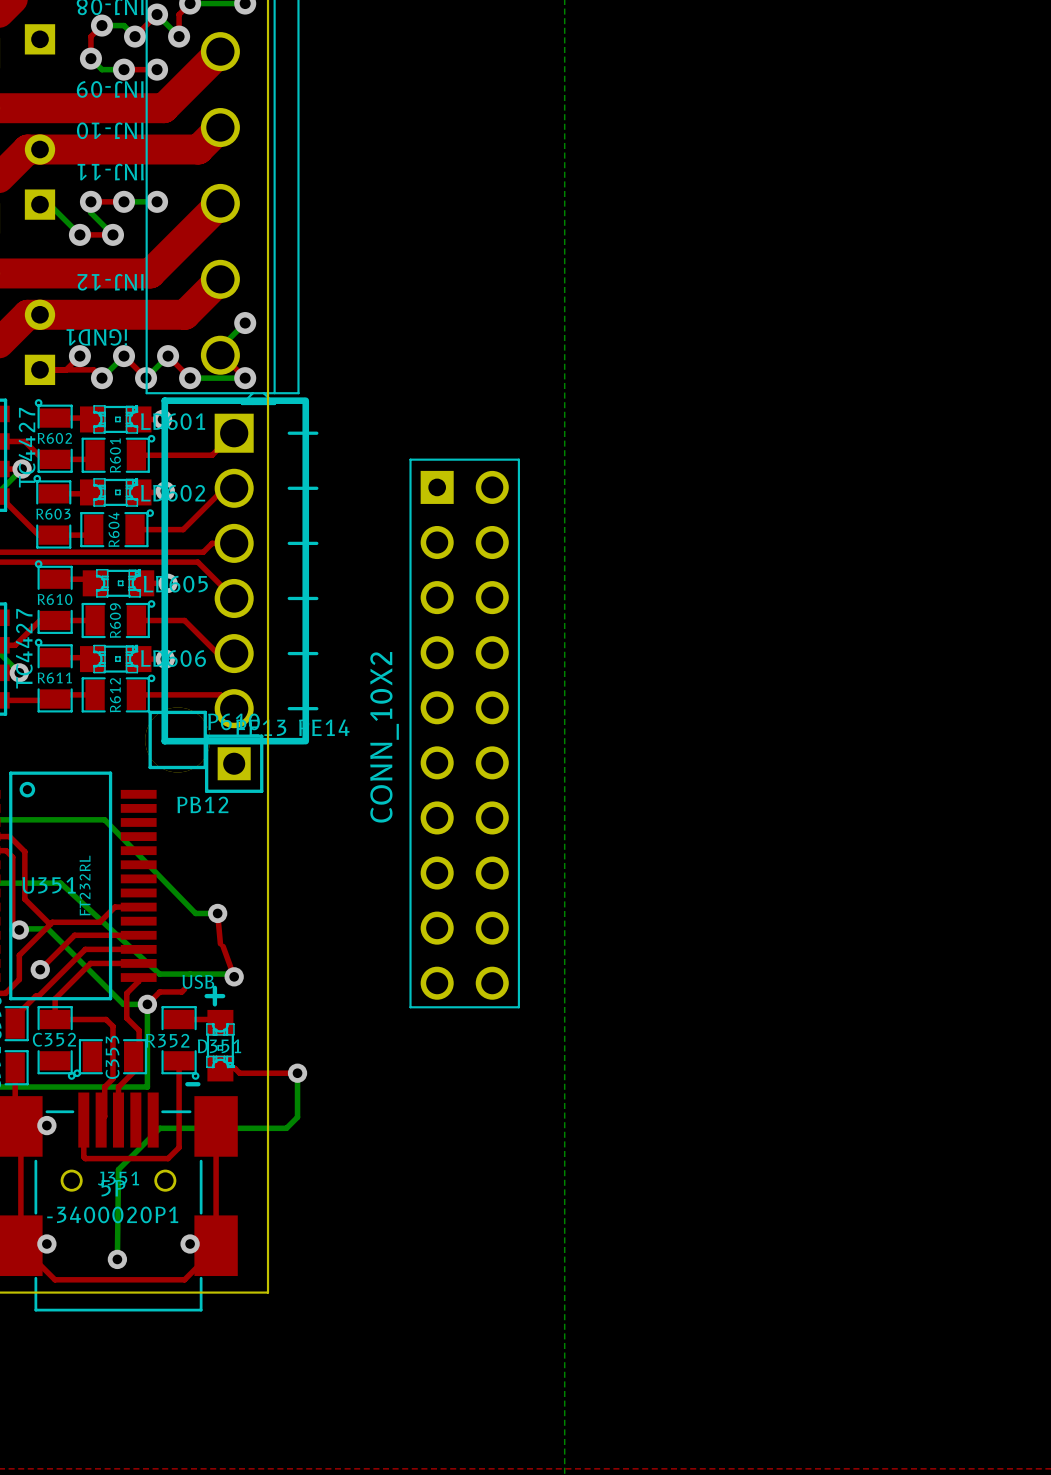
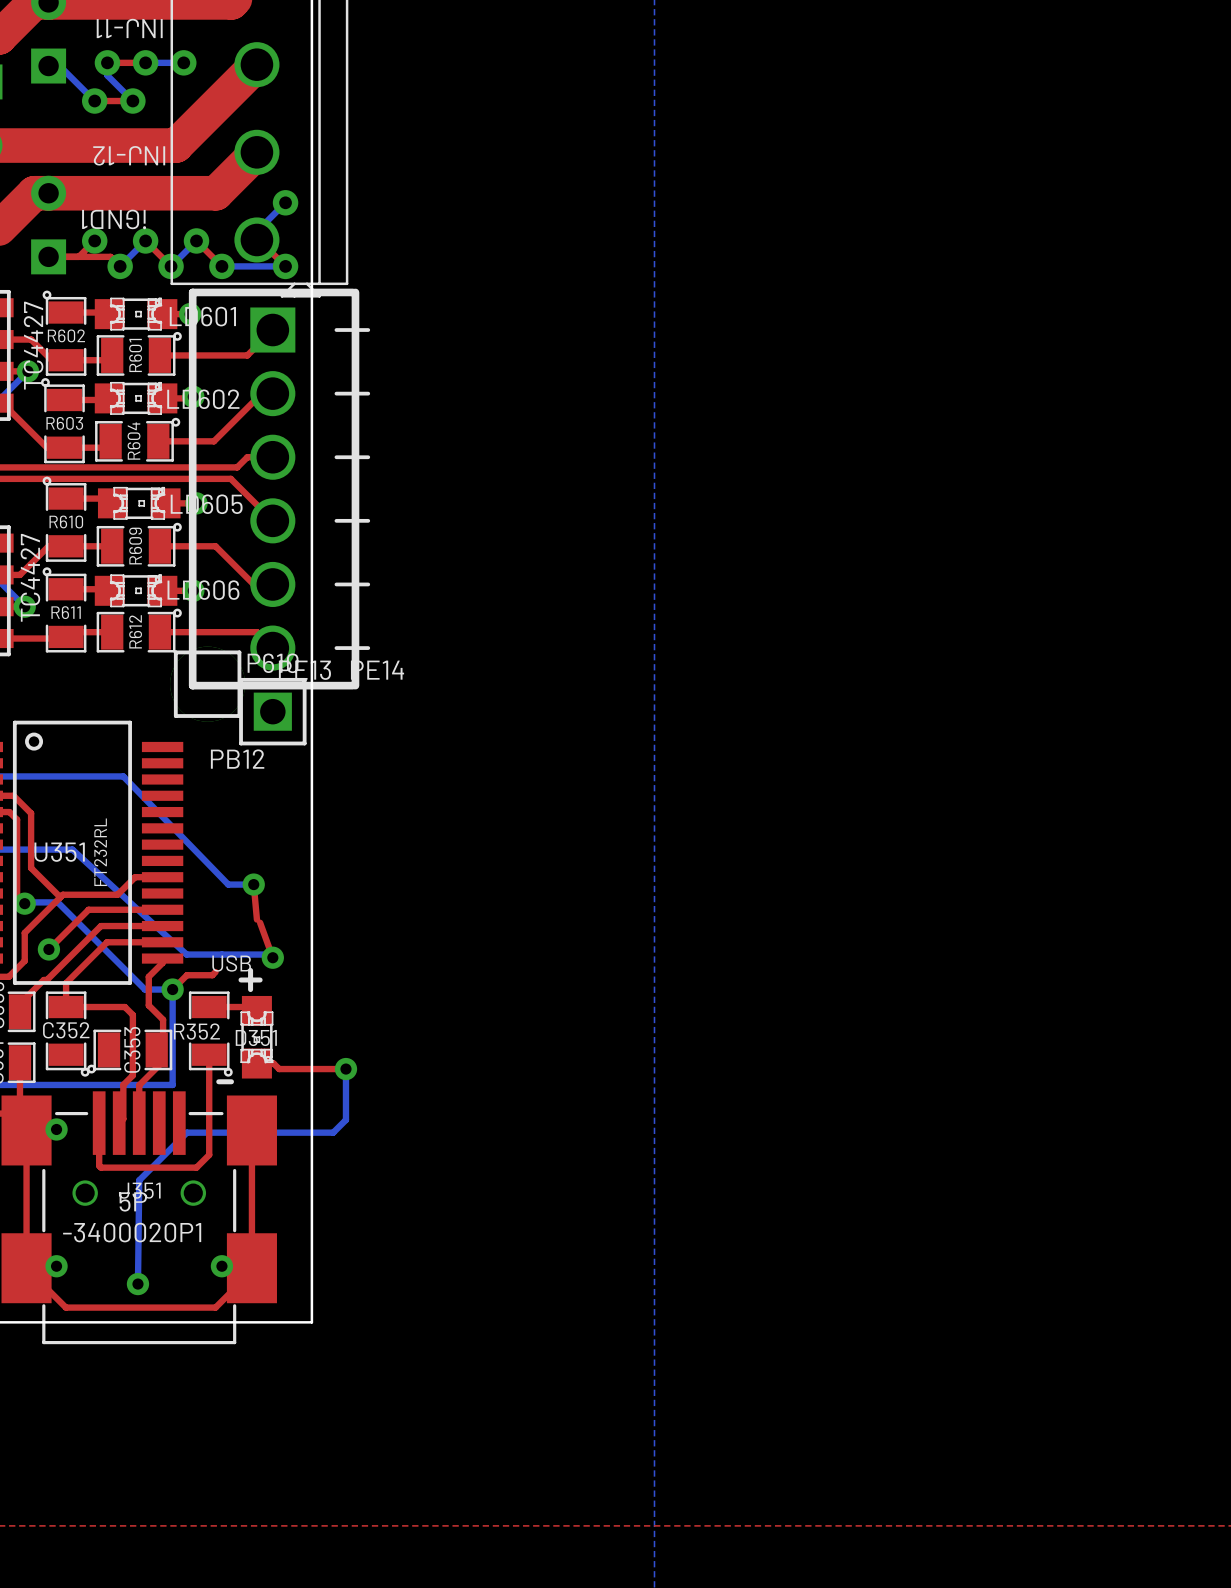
part: CONN_10X2 (464, 733) -> none

